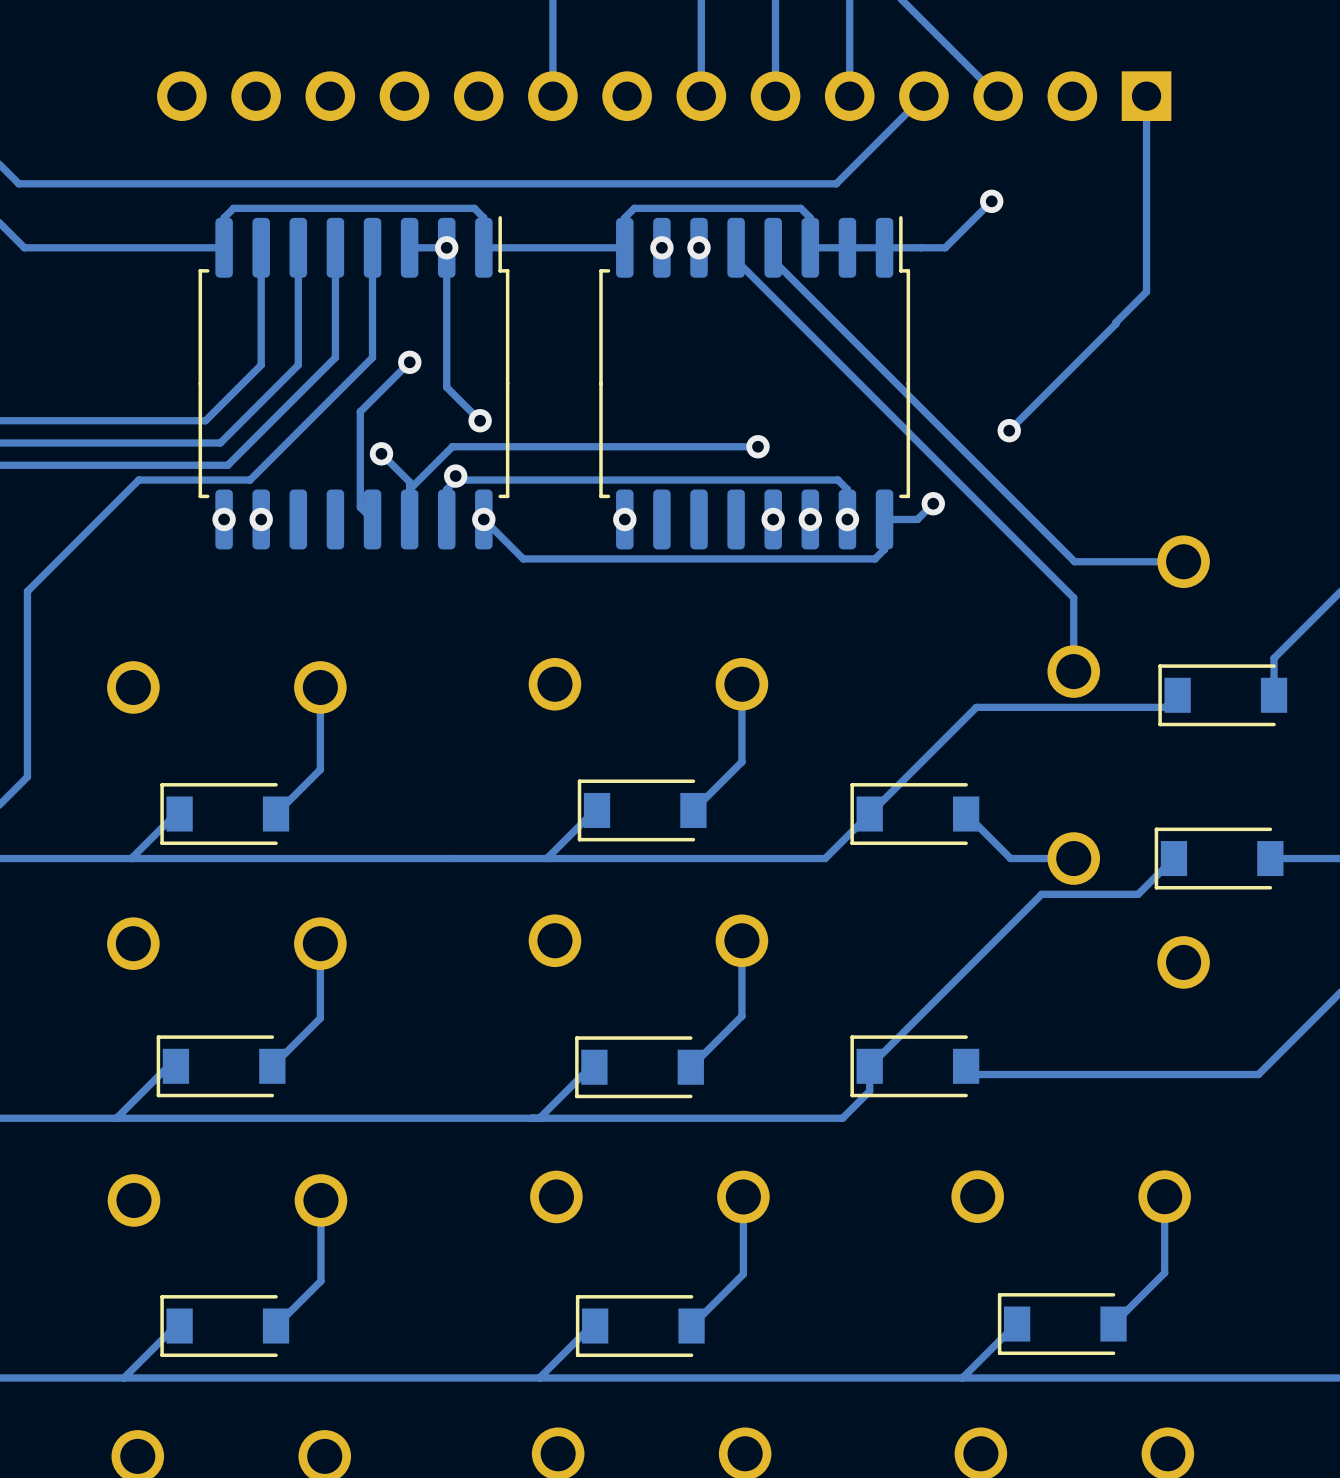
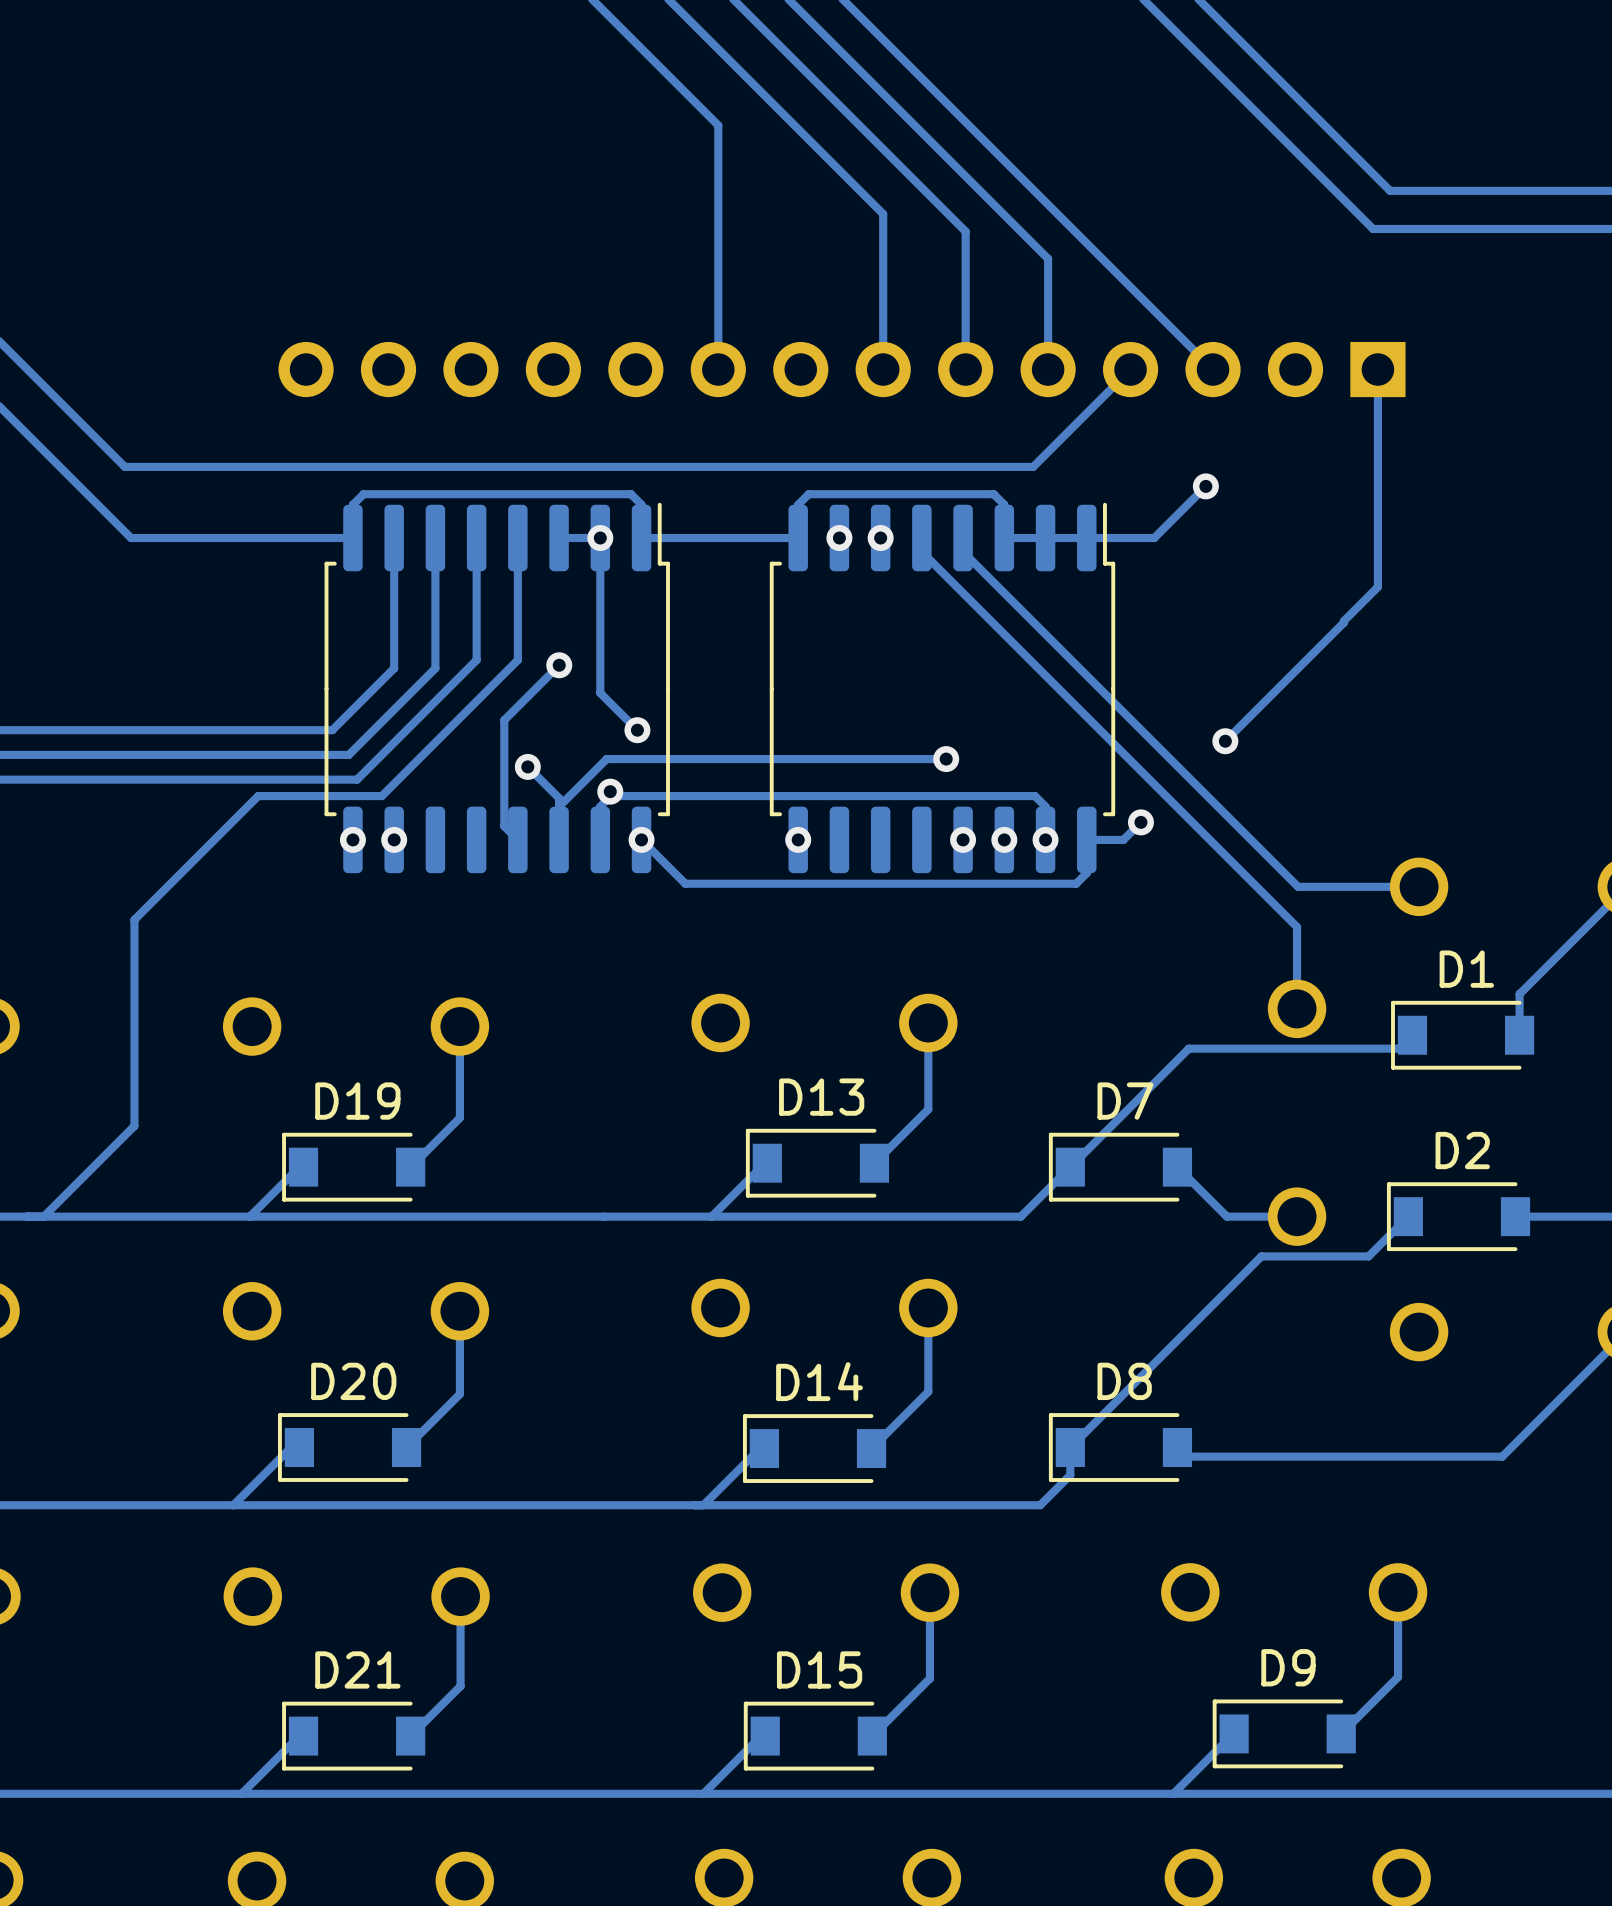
D1 name: none -> D1 (1466, 969)
D13 name: none -> D13 (821, 1097)
D19 name: none -> D19 (357, 1101)
D7 name: none -> D7 (1125, 1101)
D2 name: none -> D2 (1462, 1150)
D20 name: none -> D20 (353, 1381)
D8 name: none -> D8 (1124, 1381)
D14 name: none -> D14 (819, 1381)
D9 name: none -> D9 (1288, 1667)
D21 name: none -> D21 (357, 1669)
D15 name: none -> D15 (819, 1669)

